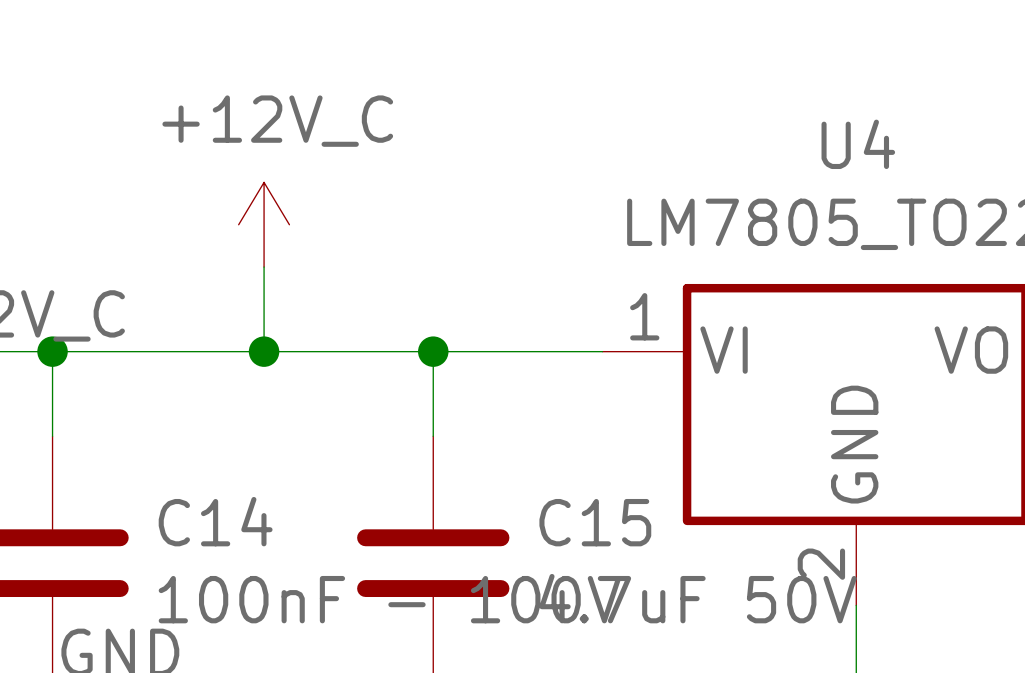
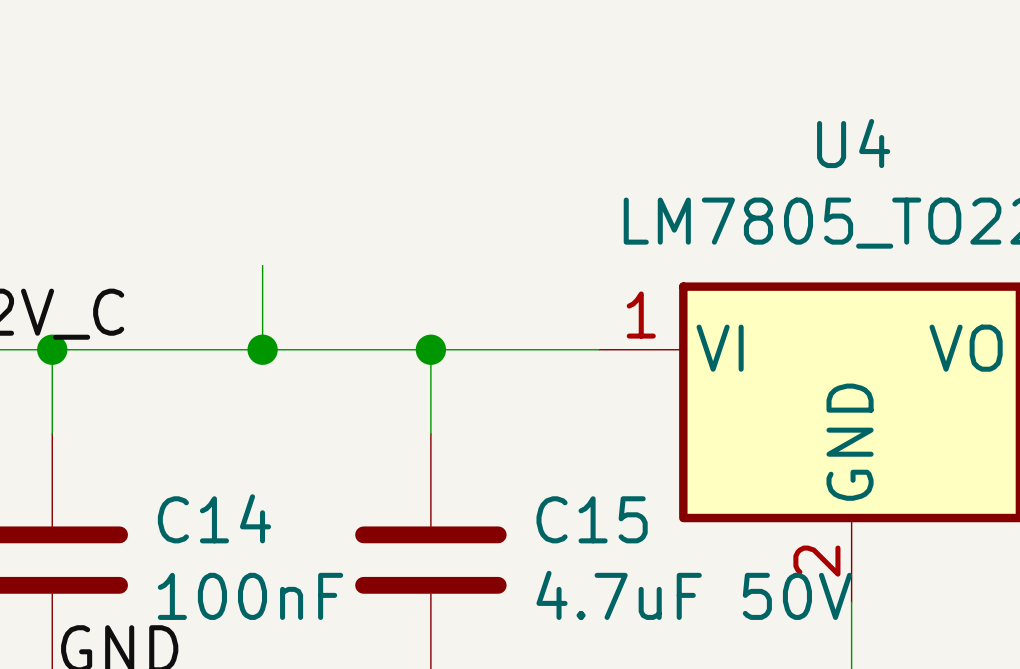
power symbol: +12V_C (264, 224) -> none
C14 value: 100nF - 100V (389, 599) -> 100nF (250, 596)

